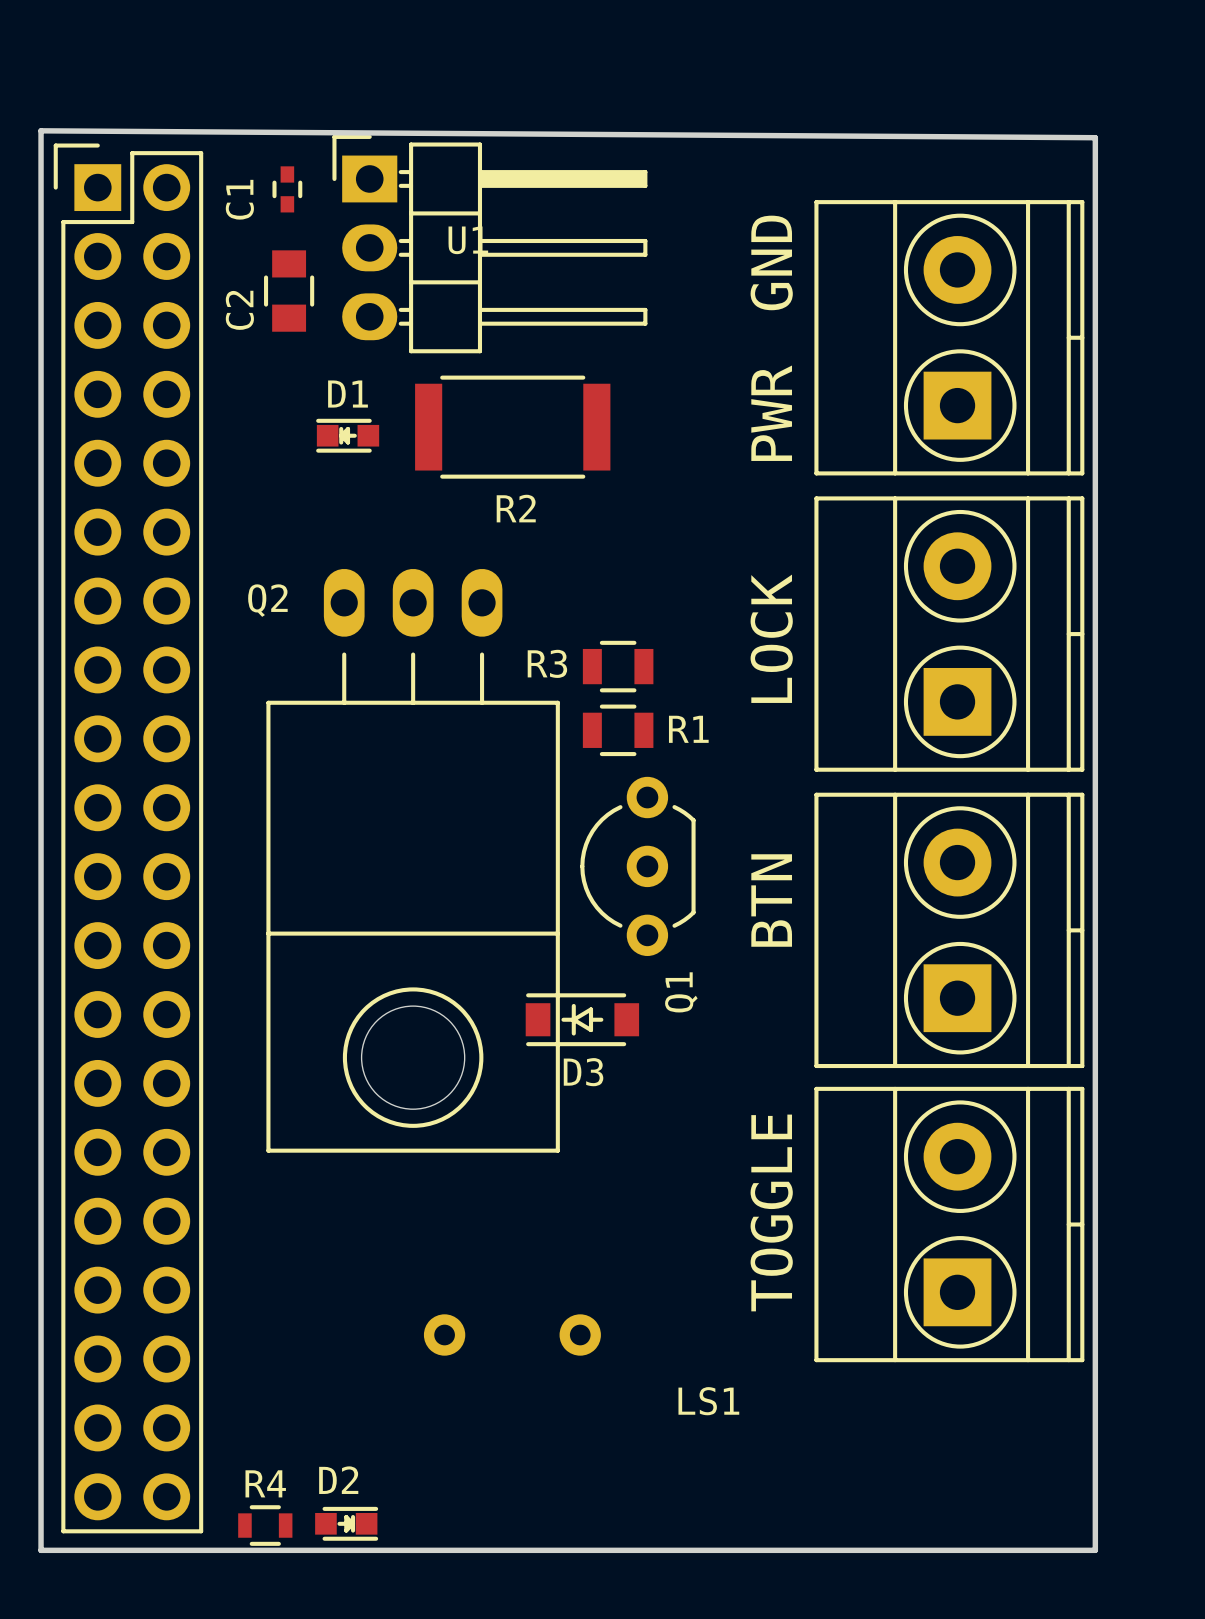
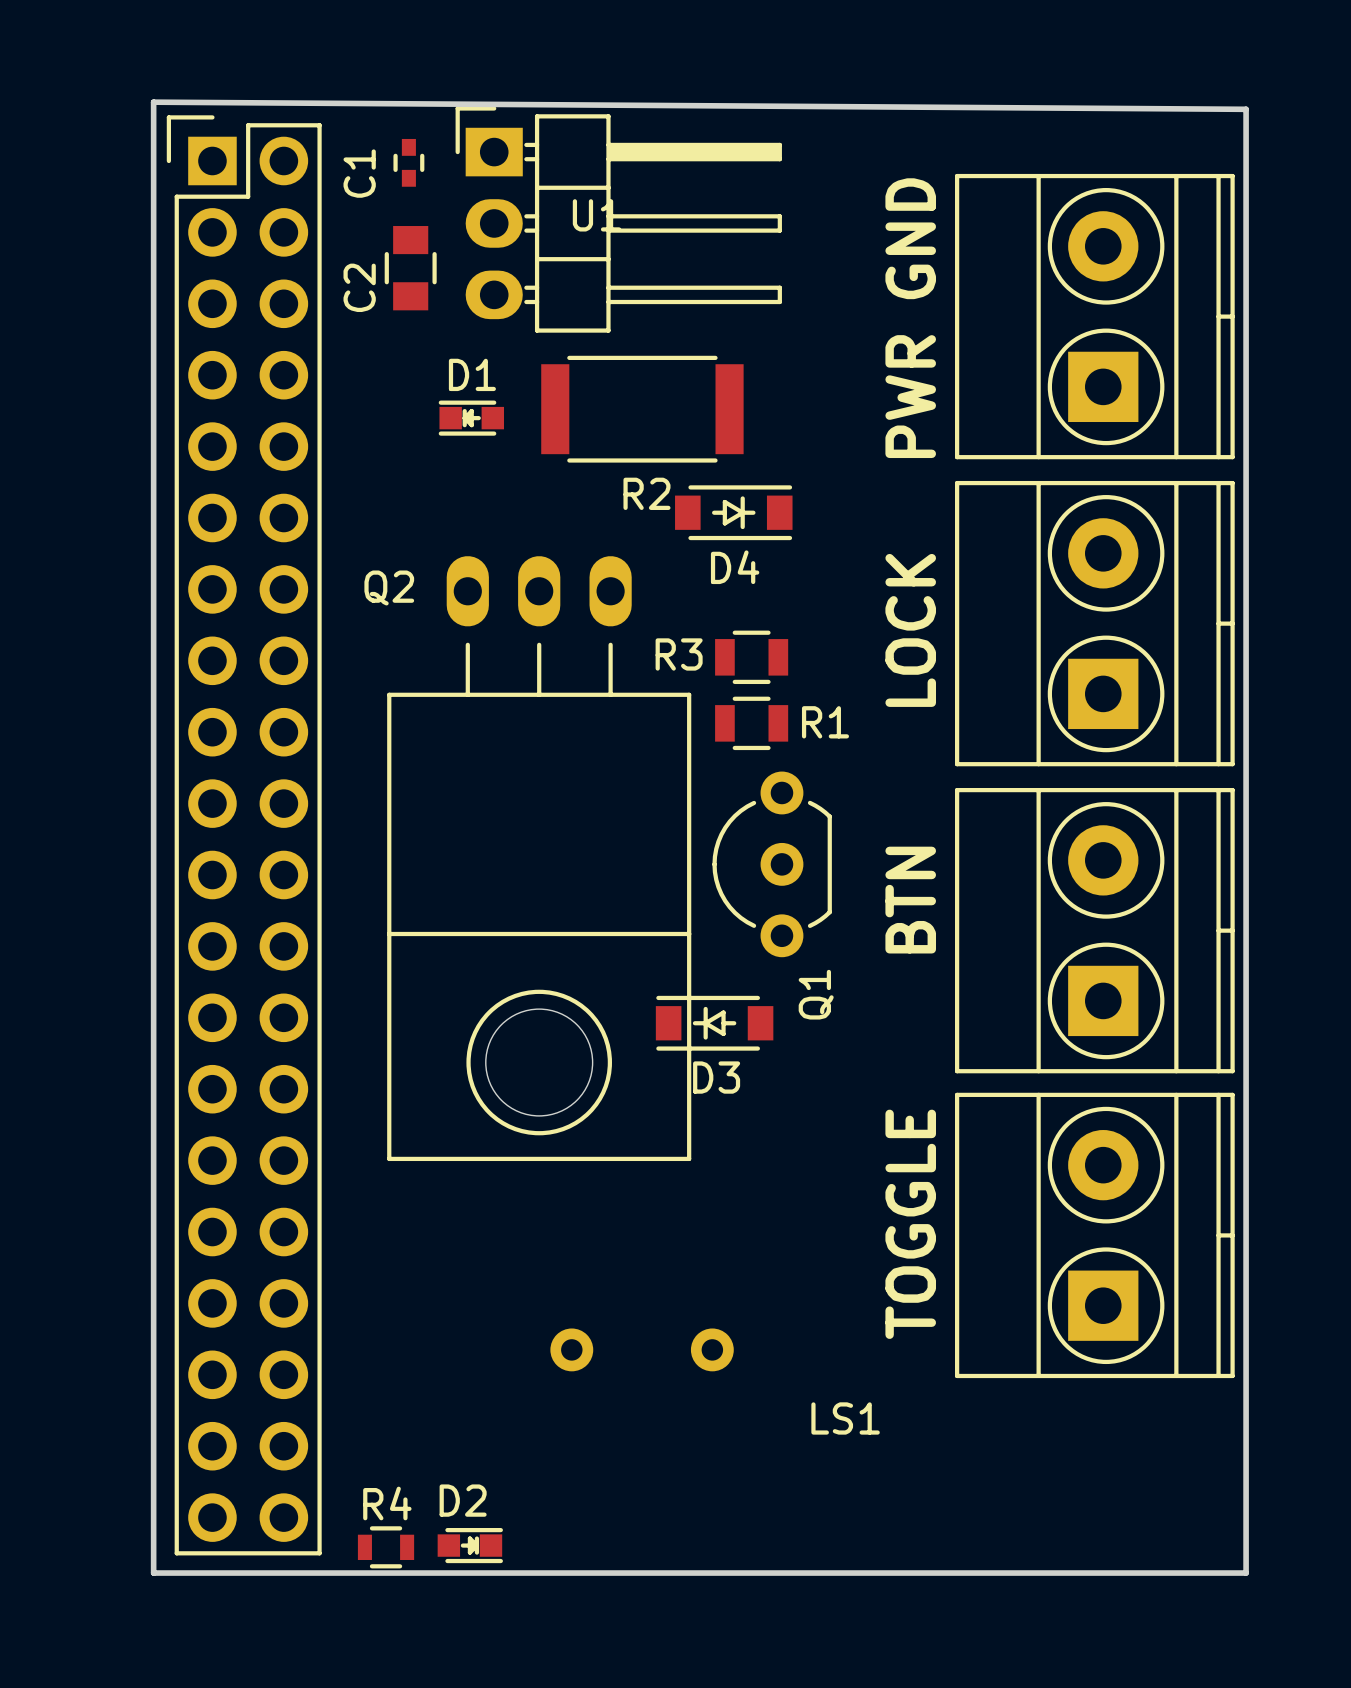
D4: none -> (733, 512)

